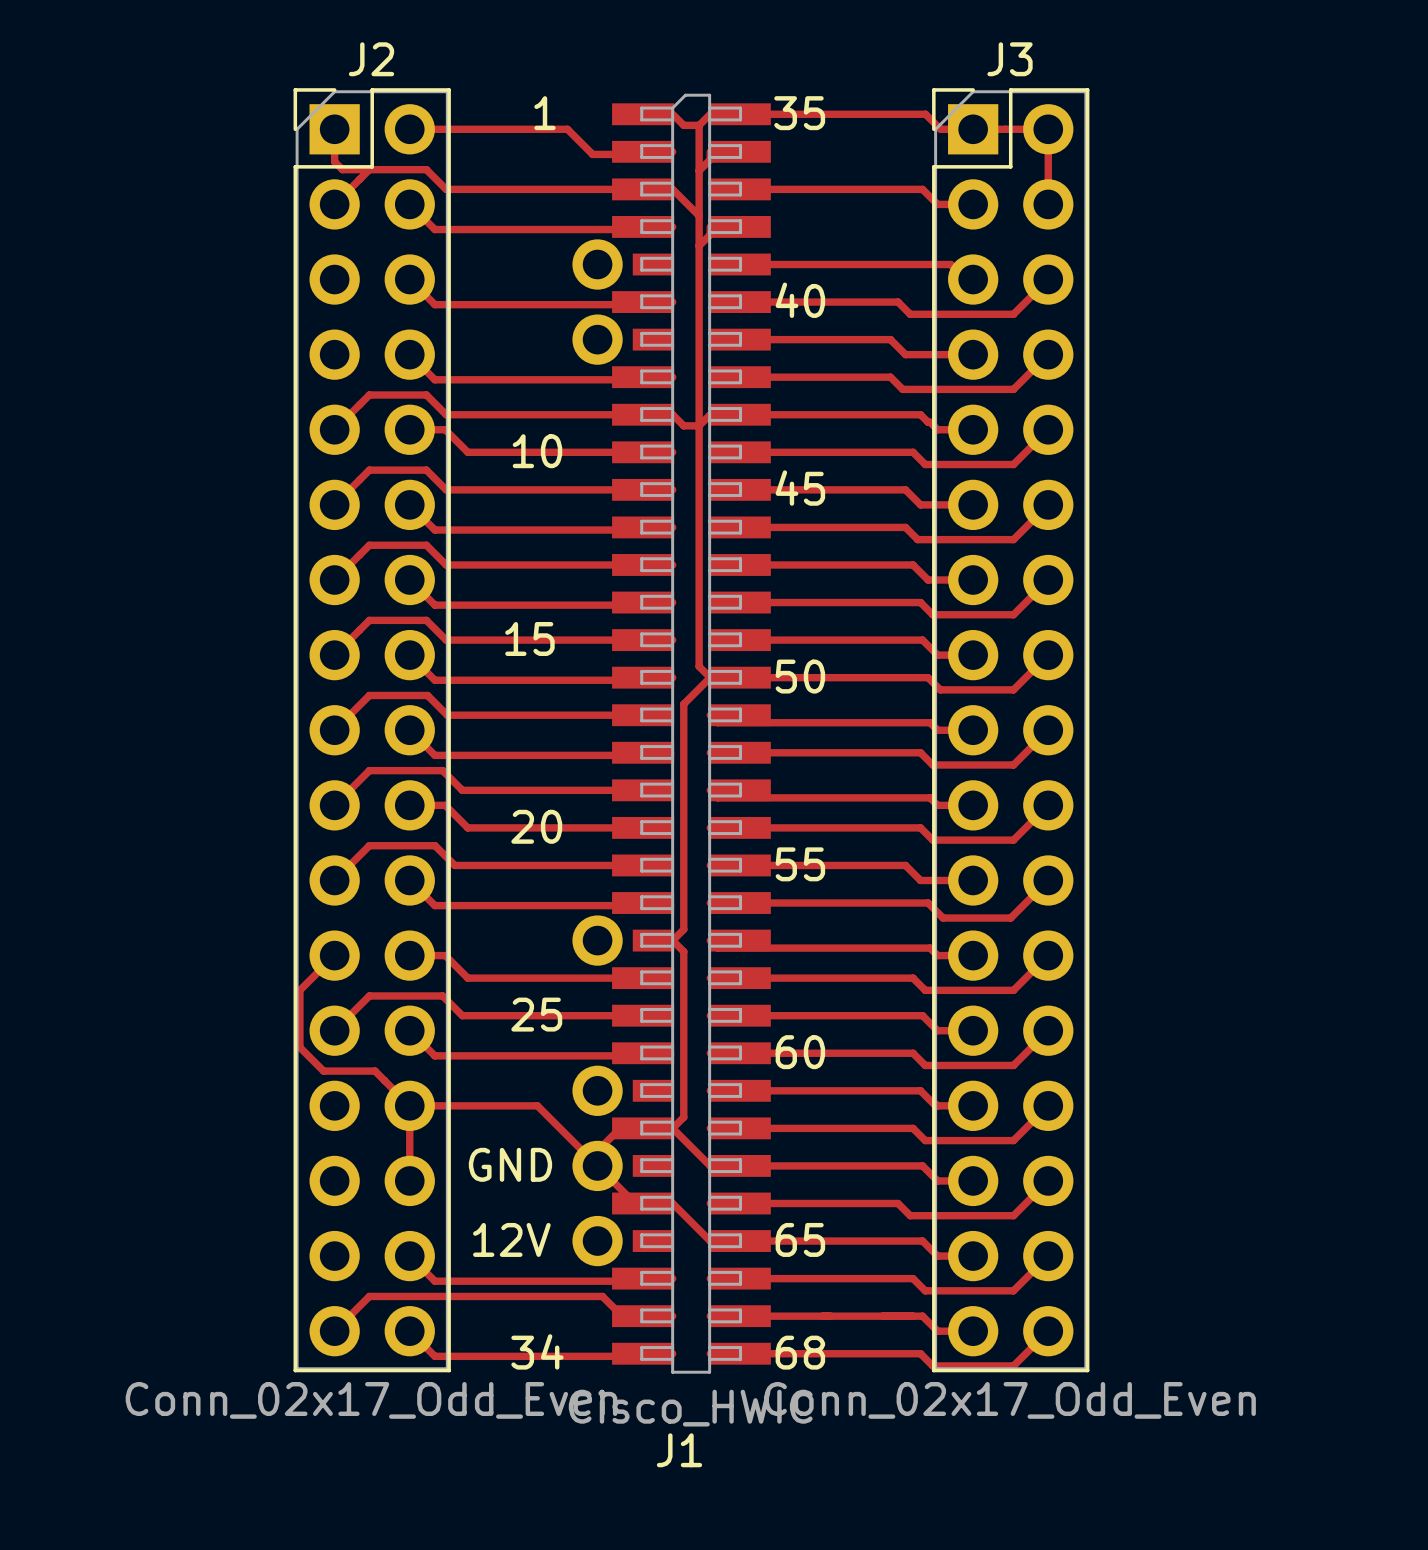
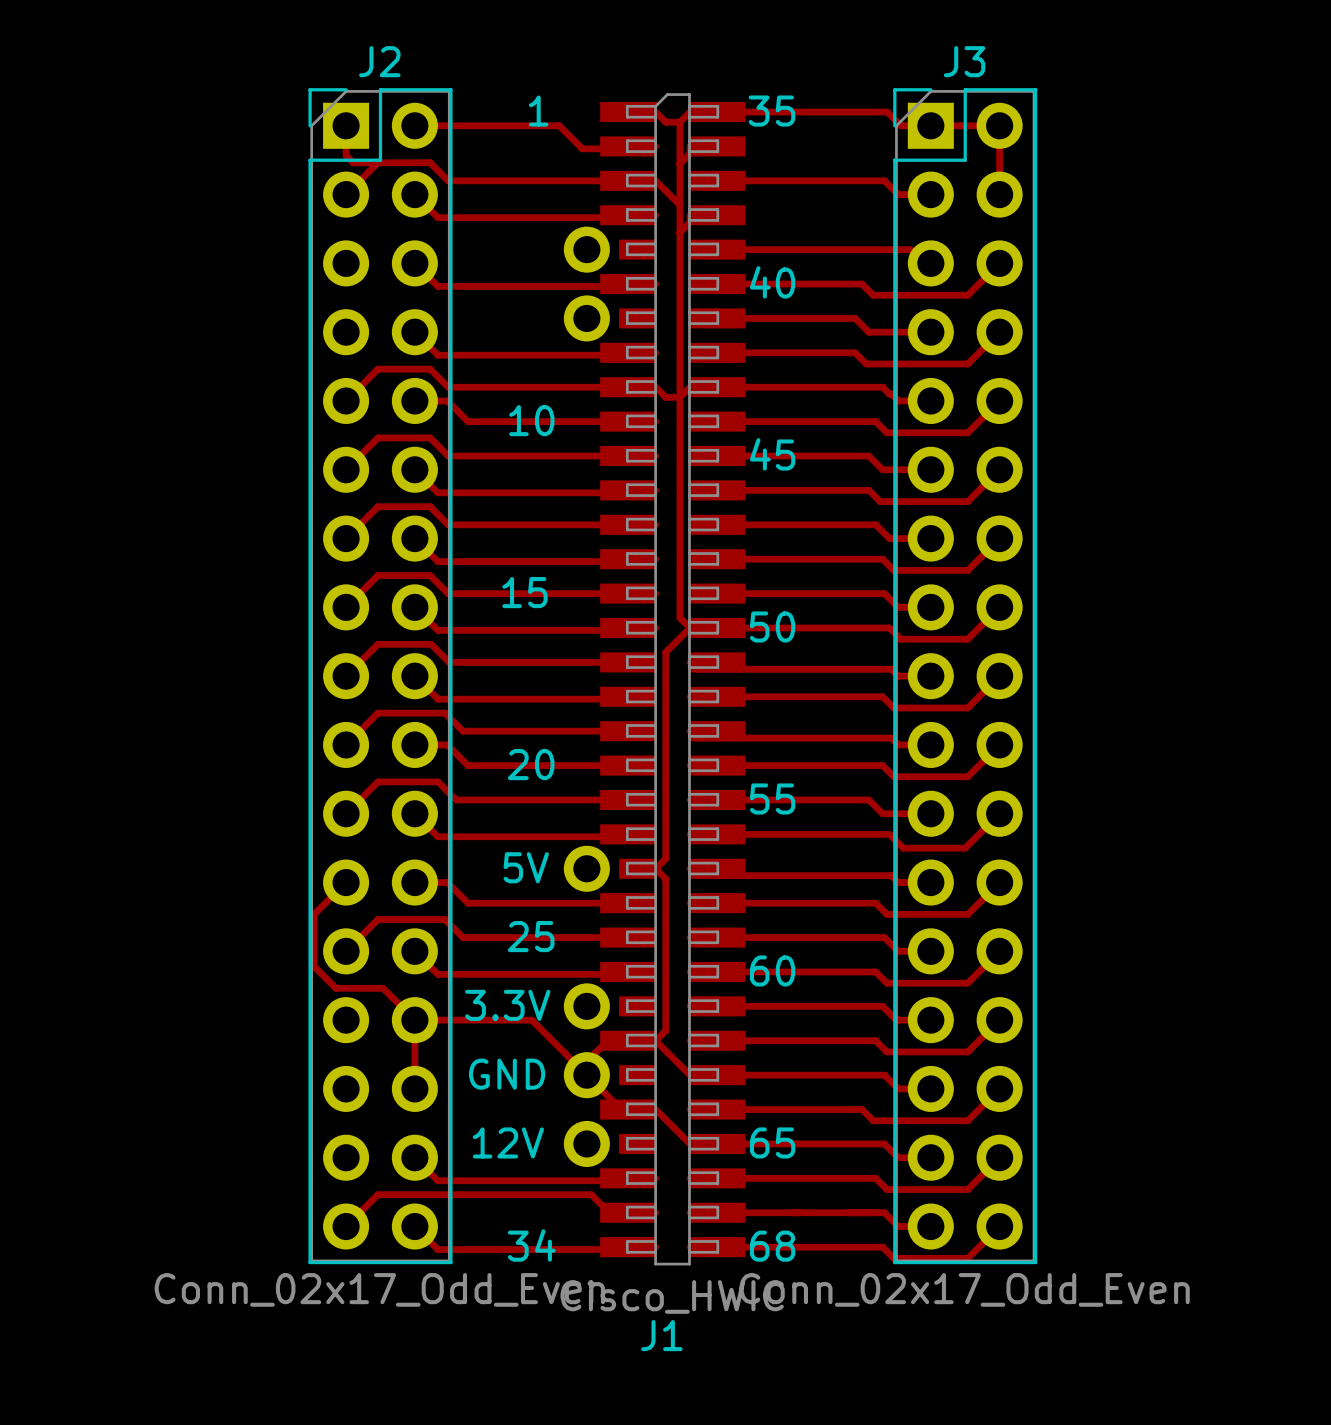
J1 text: none -> 5V (526, 867)
J1 text: none -> 3.3V (507, 1005)

